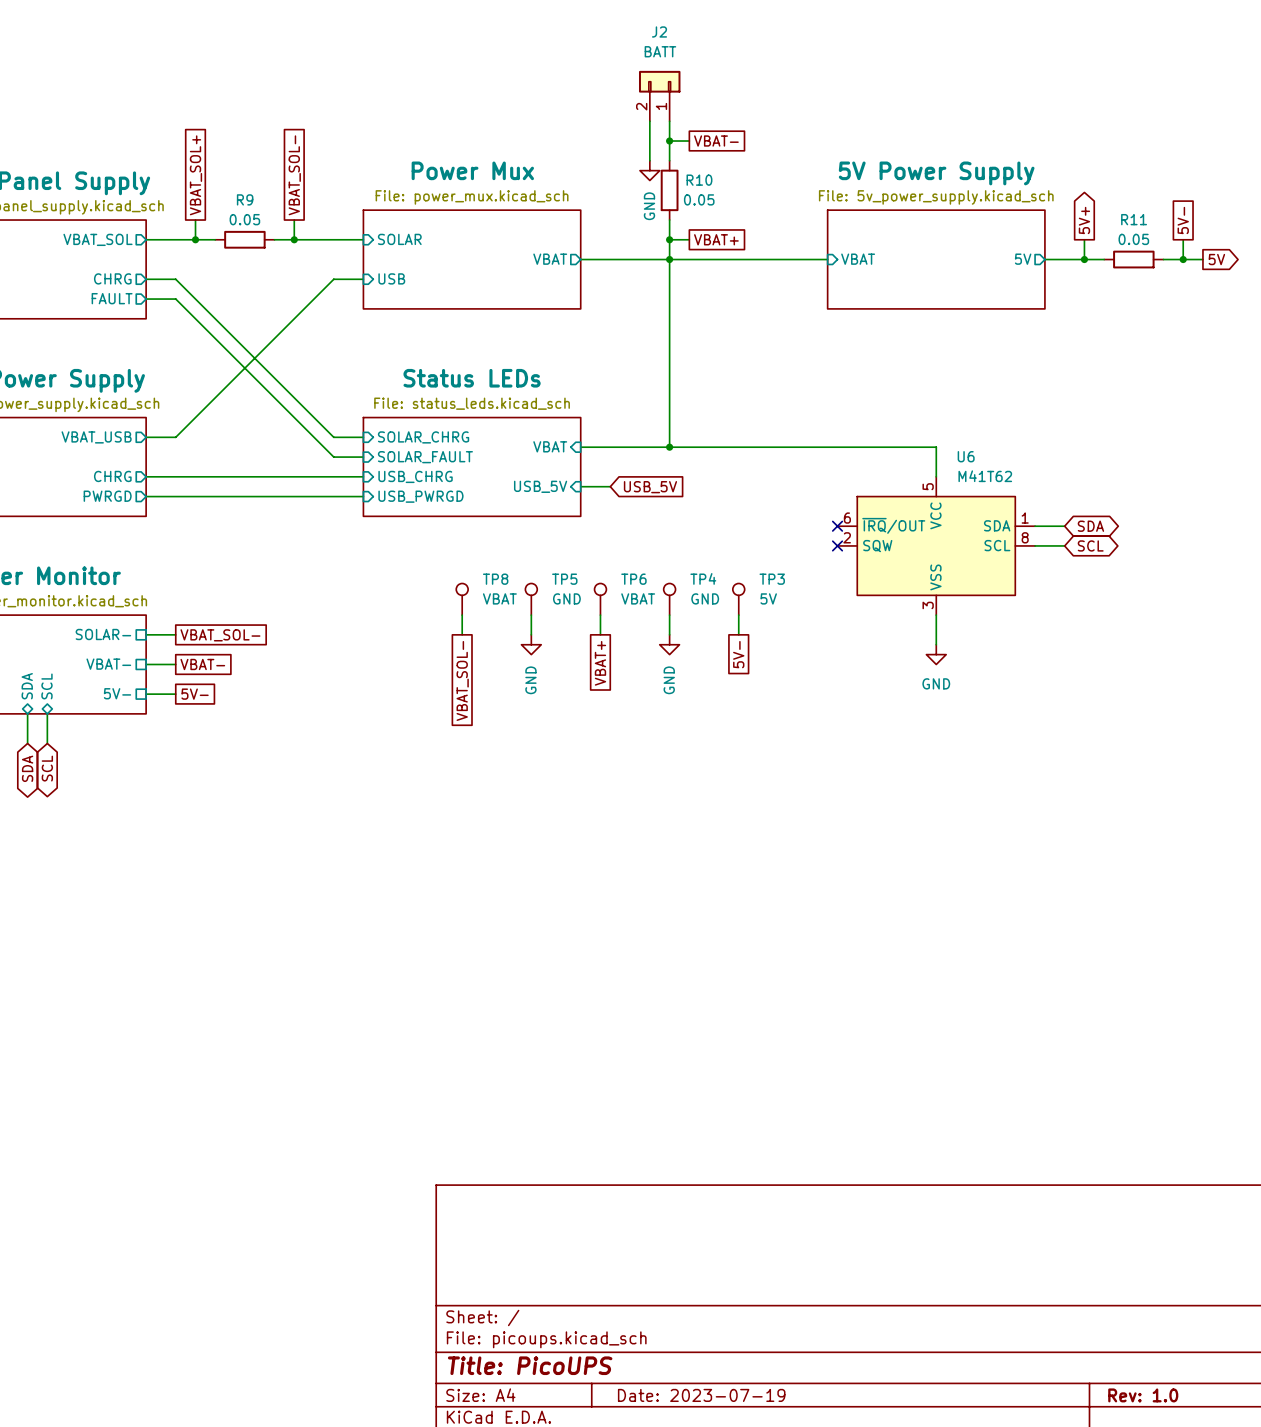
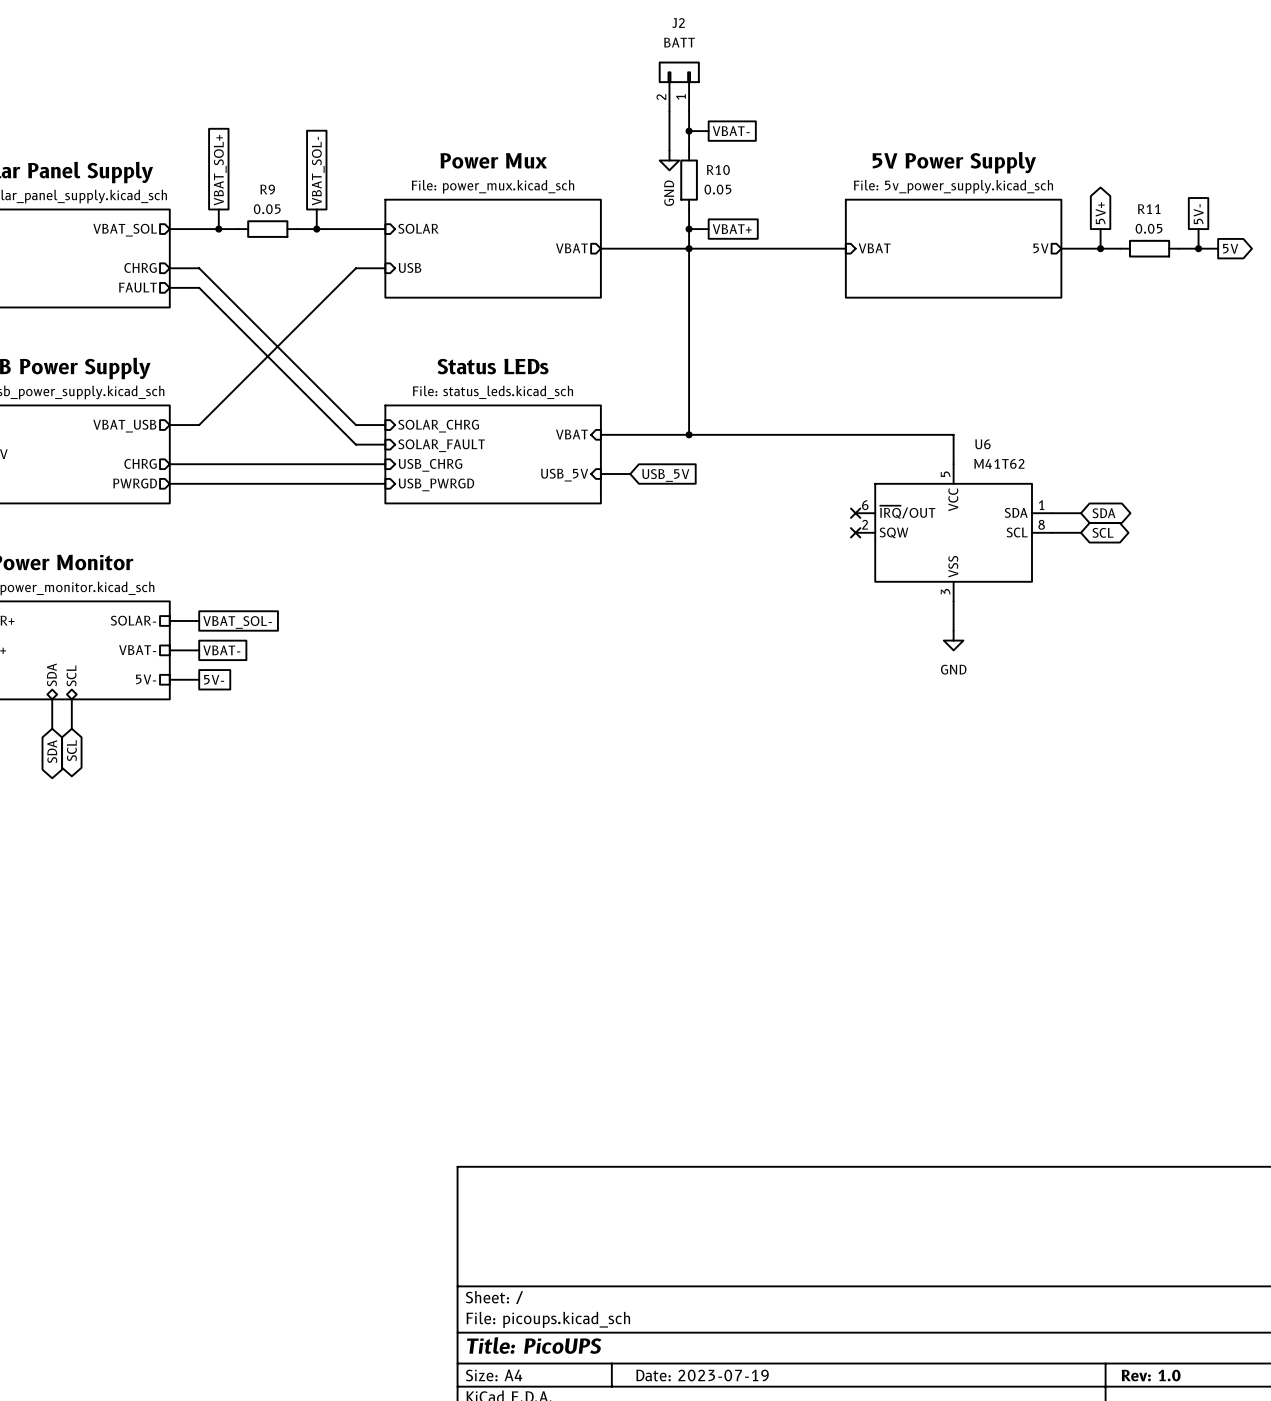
TP8: VBAT (462, 599) -> none
TP5: GND (531, 599) -> none
TP6: VBAT (600, 599) -> none
TP4: GND (669, 599) -> none
TP3: 5V (738, 599) -> none
wire: (462, 615) (462, 634) -> none
wire: (531, 615) (531, 634) -> none
wire: (600, 615) (600, 634) -> none
wire: (669, 615) (669, 634) -> none
wire: (738, 615) (738, 634) -> none
power symbol: GND (531, 644) -> none
power symbol: GND (669, 644) -> none
global label: 5V- (738, 654) -> none
global label: VBAT+ (600, 663) -> none
global label: VBAT_SOL- (462, 680) -> none

